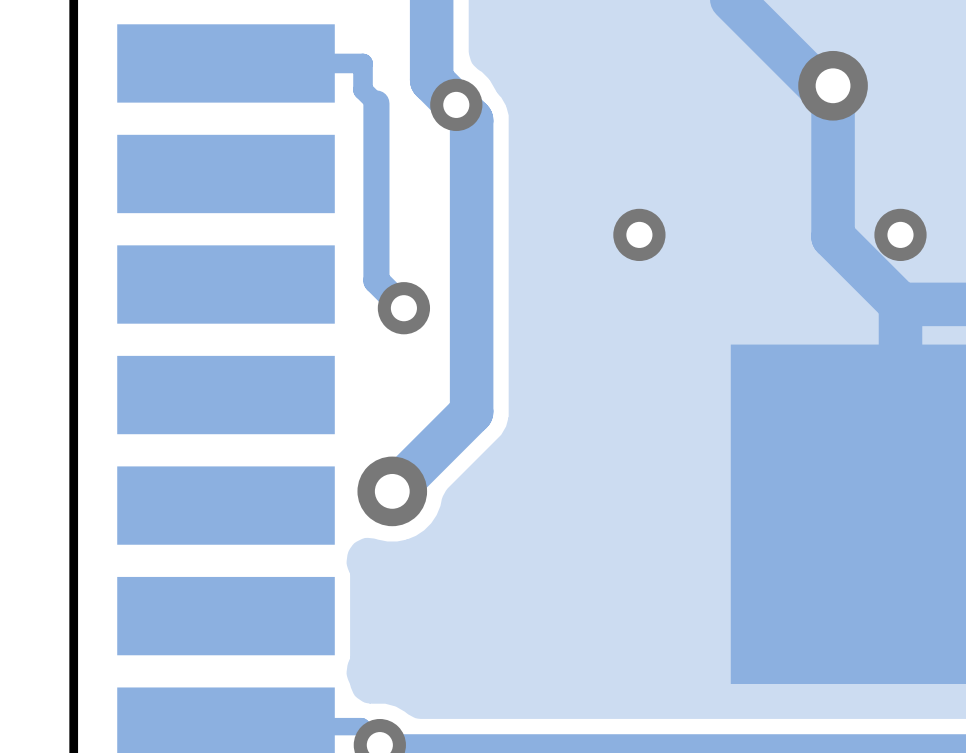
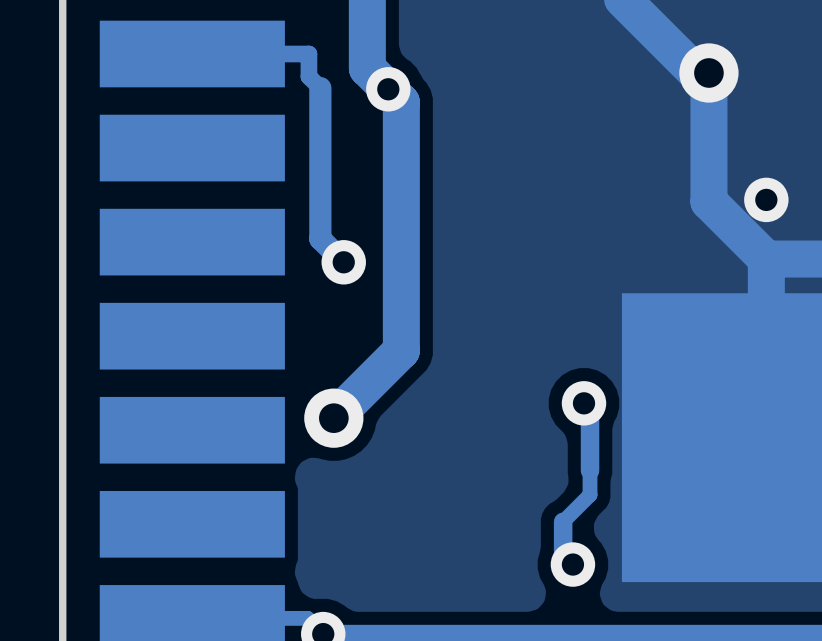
via: (639, 234) -> none
track: none -> (584, 403) (590, 409) (590, 494) (563, 521) (563, 554) (572, 564)
via: none -> (584, 403)
via: none -> (572, 564)

